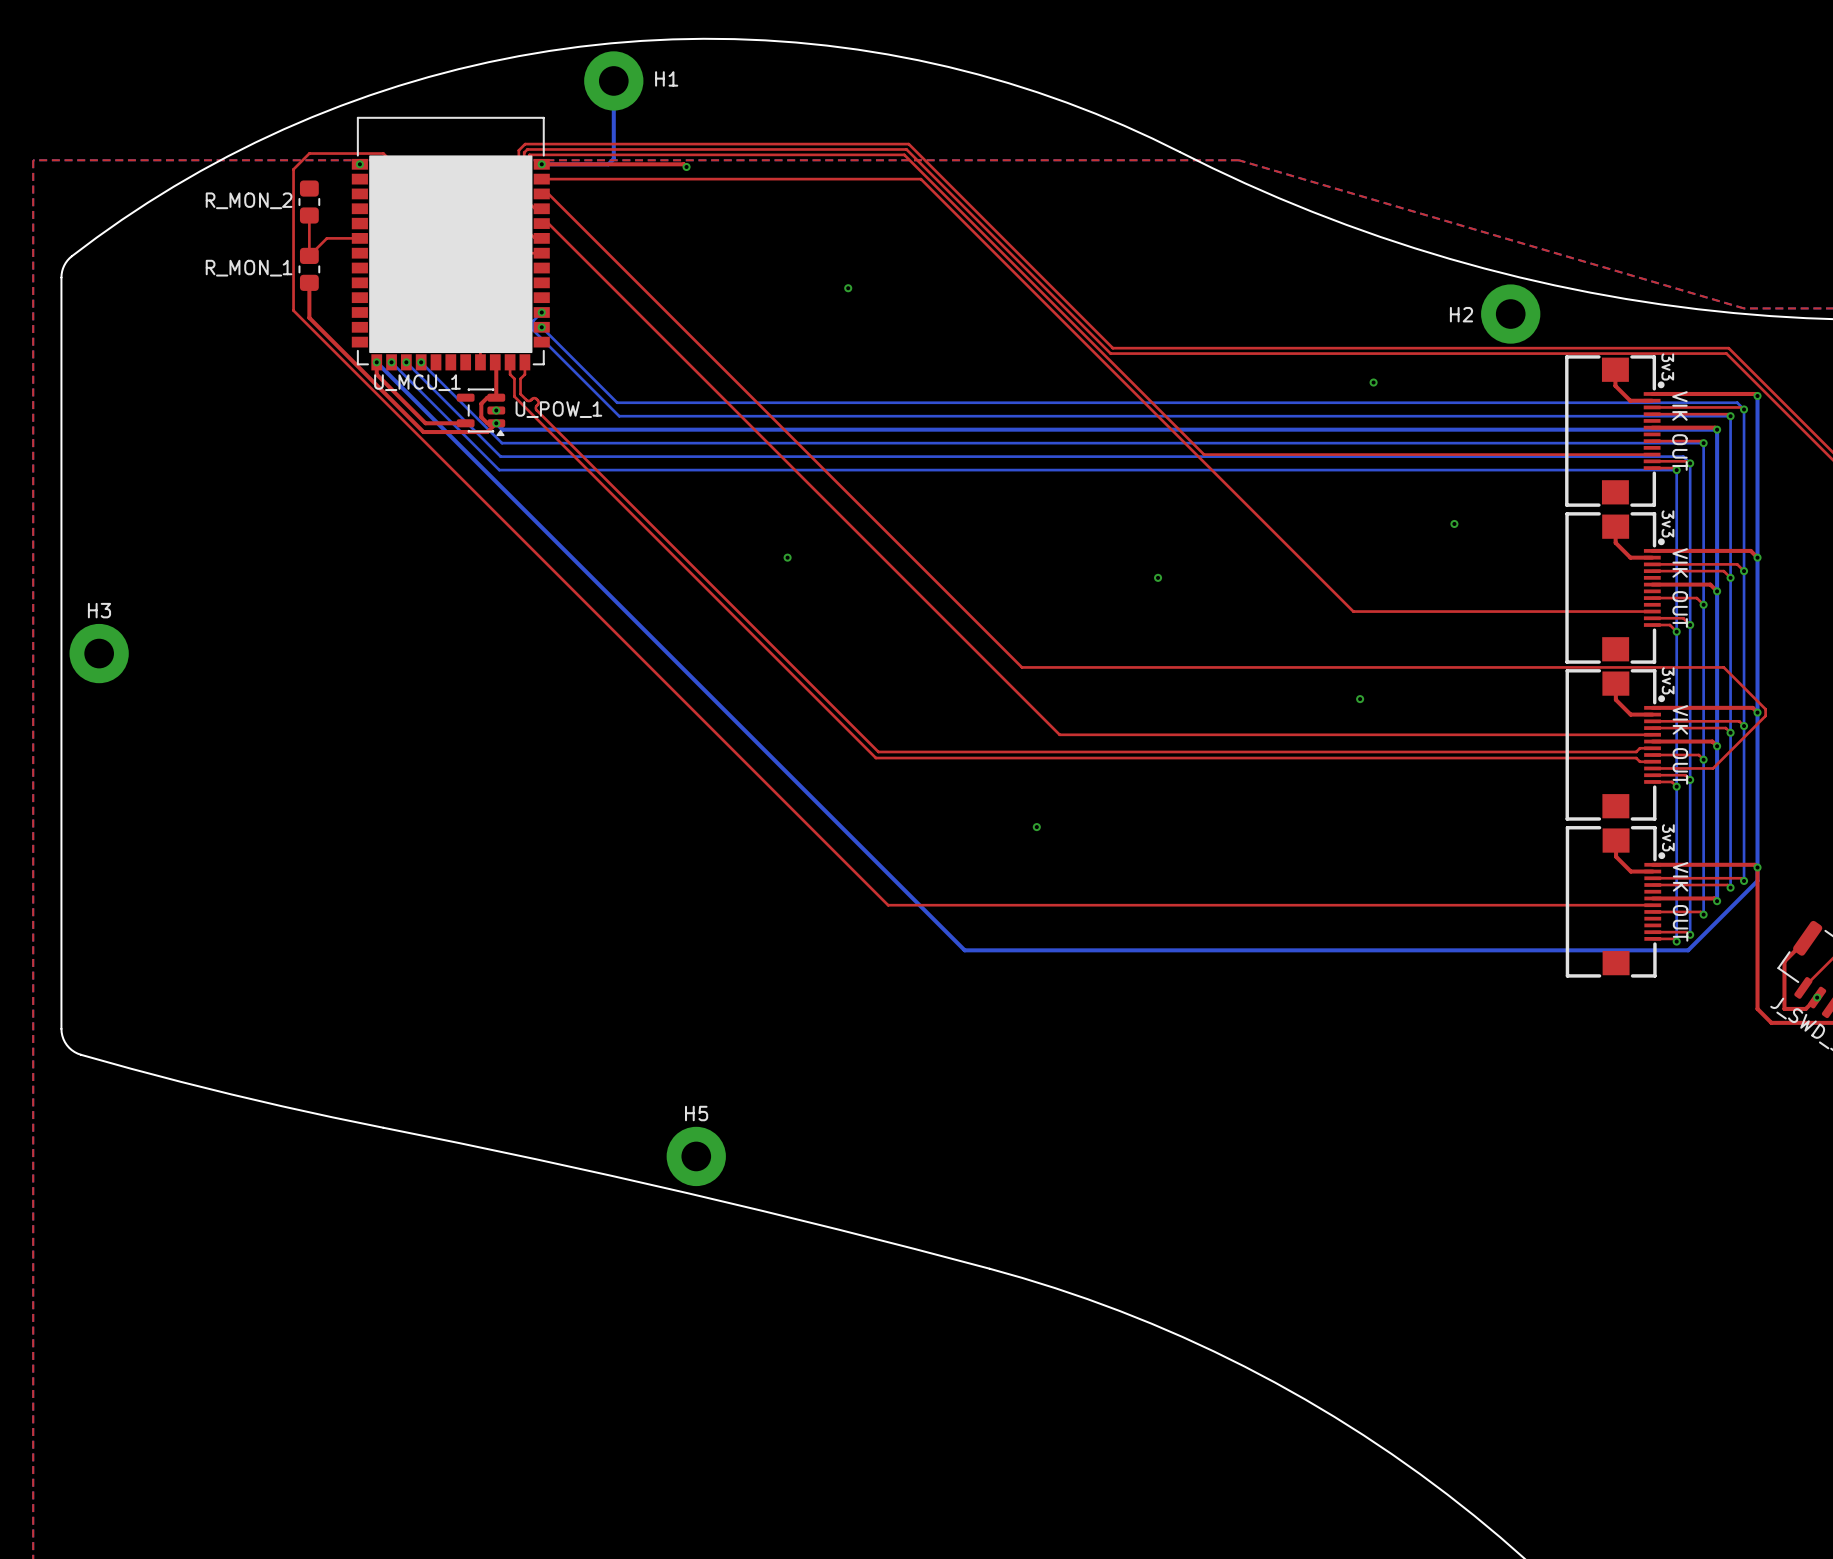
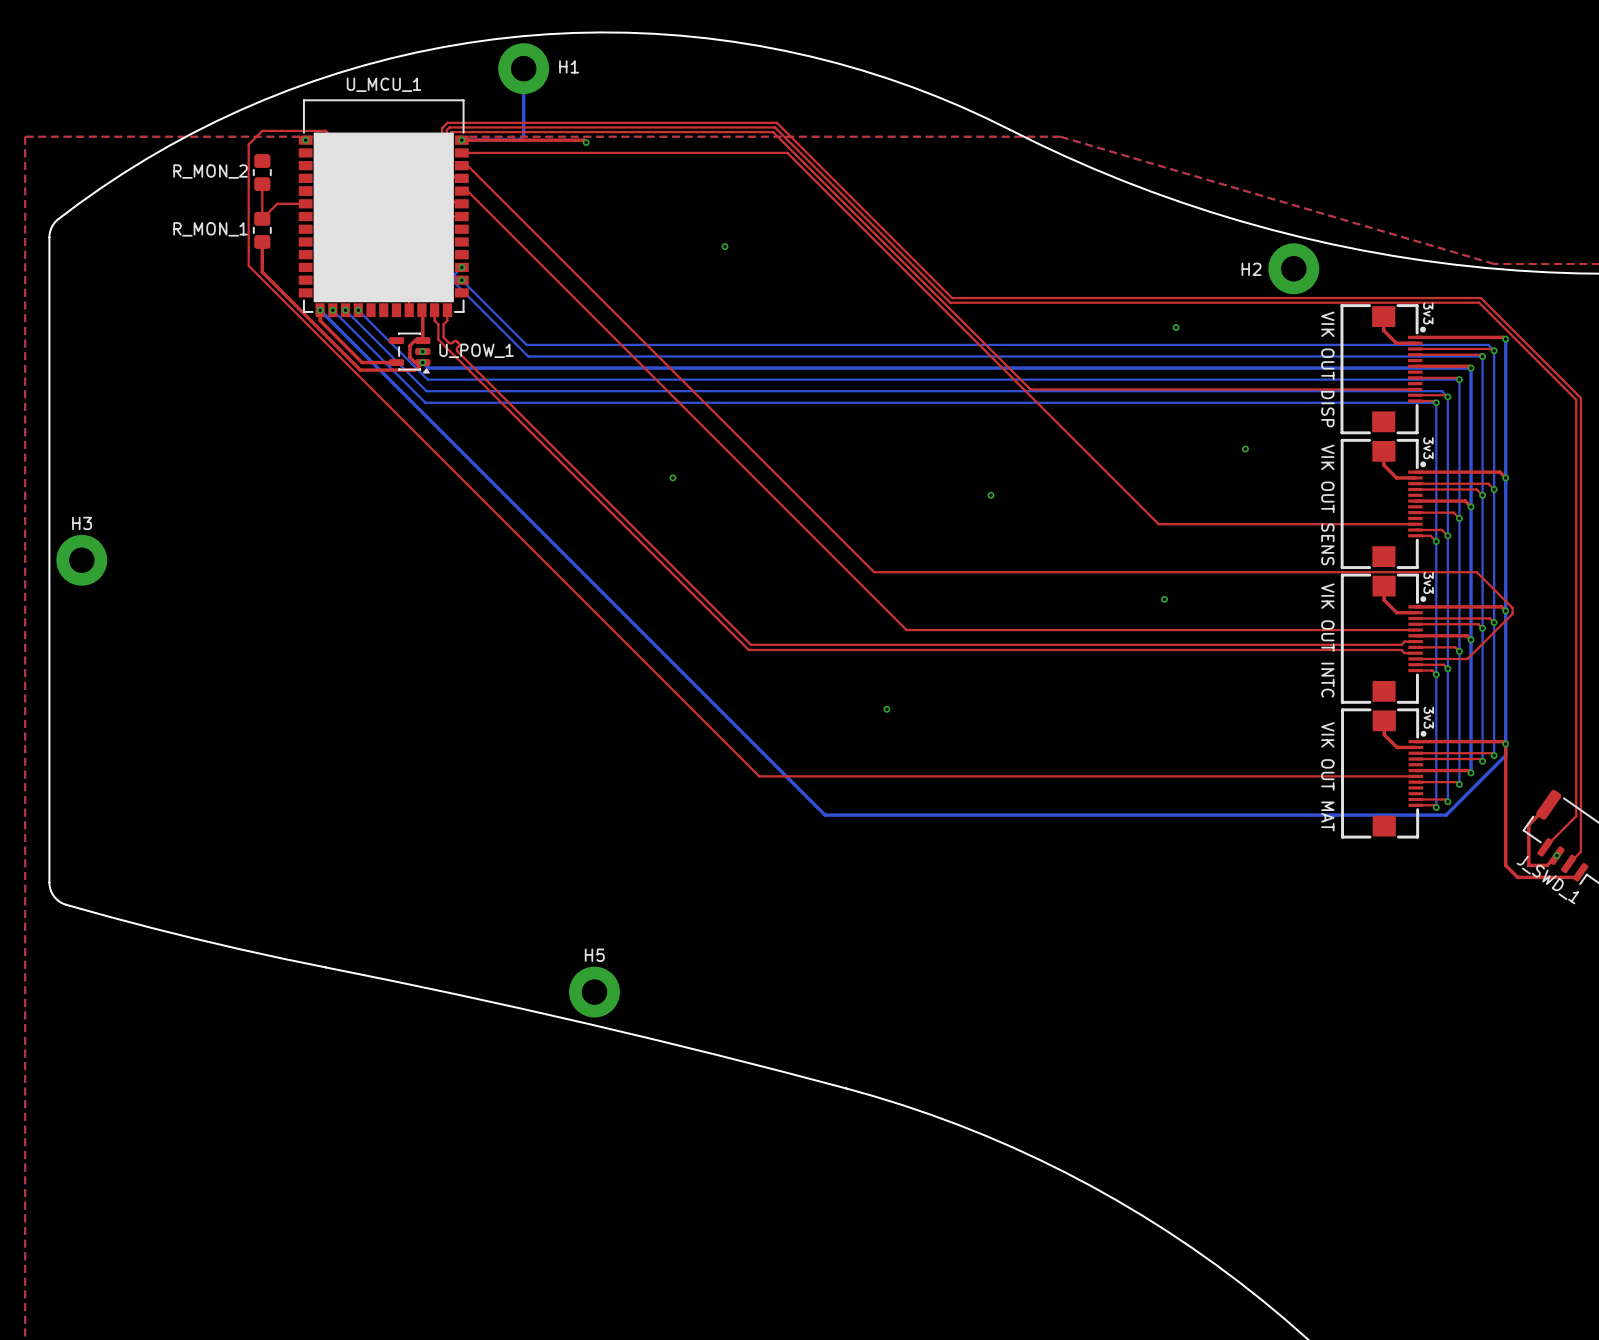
part footprint: [1565, 355, 1665, 507] -> [1340, 304, 1426, 435]
U_MCU_1 name position: U_MCU_1 (417, 382) -> U_MCU_1 (384, 84)
part footprint: [1565, 512, 1665, 664] -> [1340, 438, 1427, 570]
part footprint: [1565, 669, 1666, 821] -> [1340, 573, 1427, 704]
part footprint: [1565, 826, 1666, 978] -> [1341, 708, 1427, 839]

